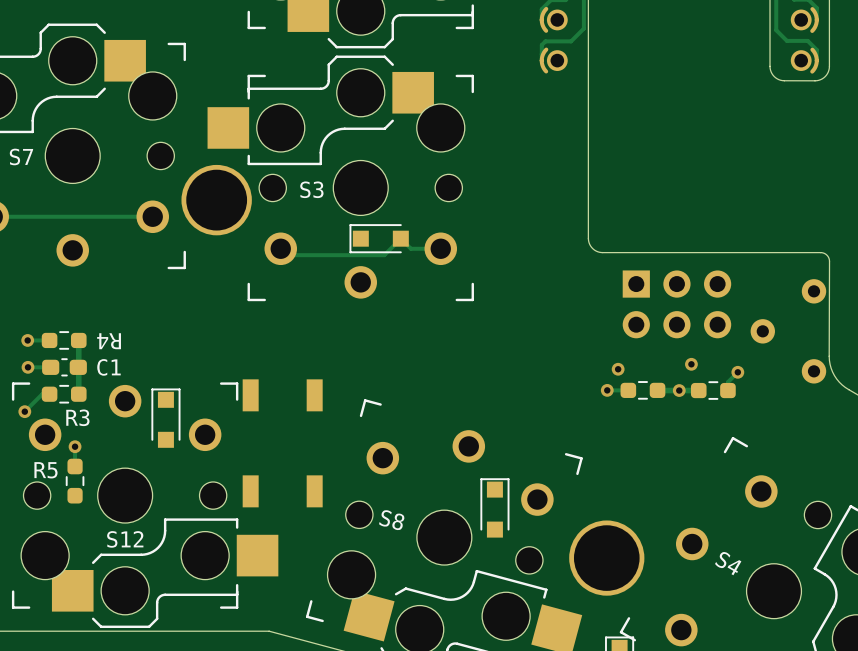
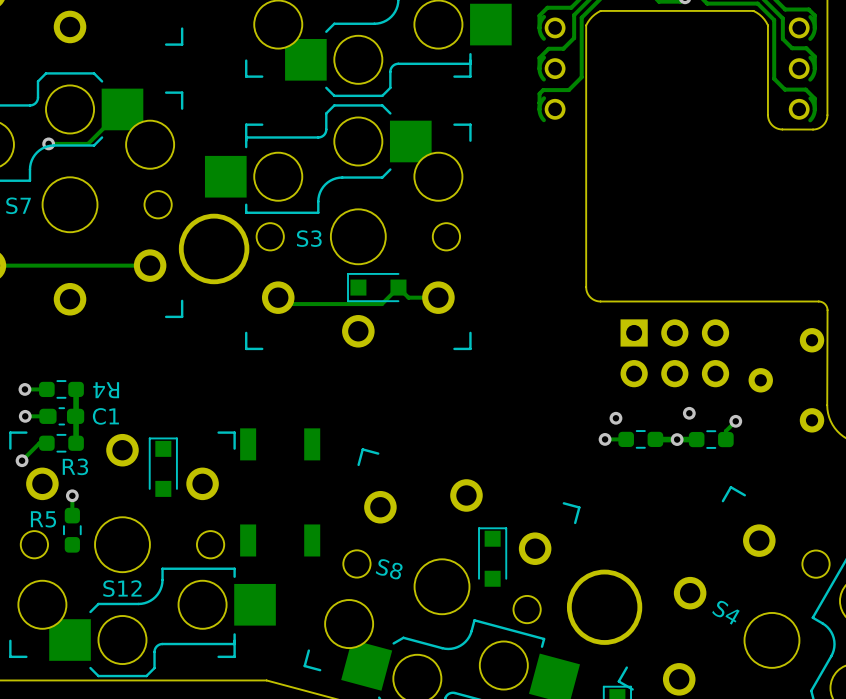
track: none -> (122, 109) (88, 143) (48, 143)
via: none -> (48, 143)

